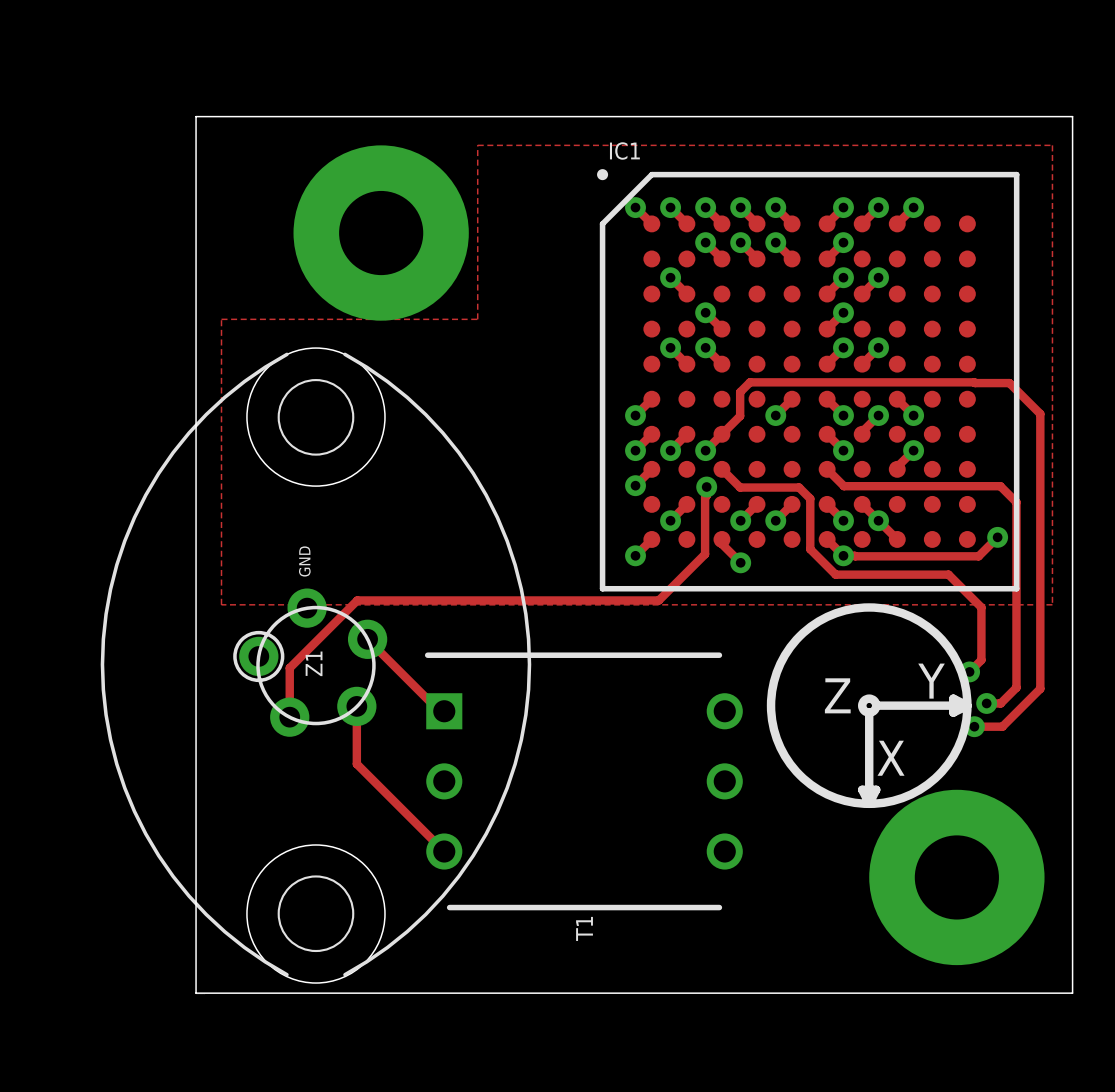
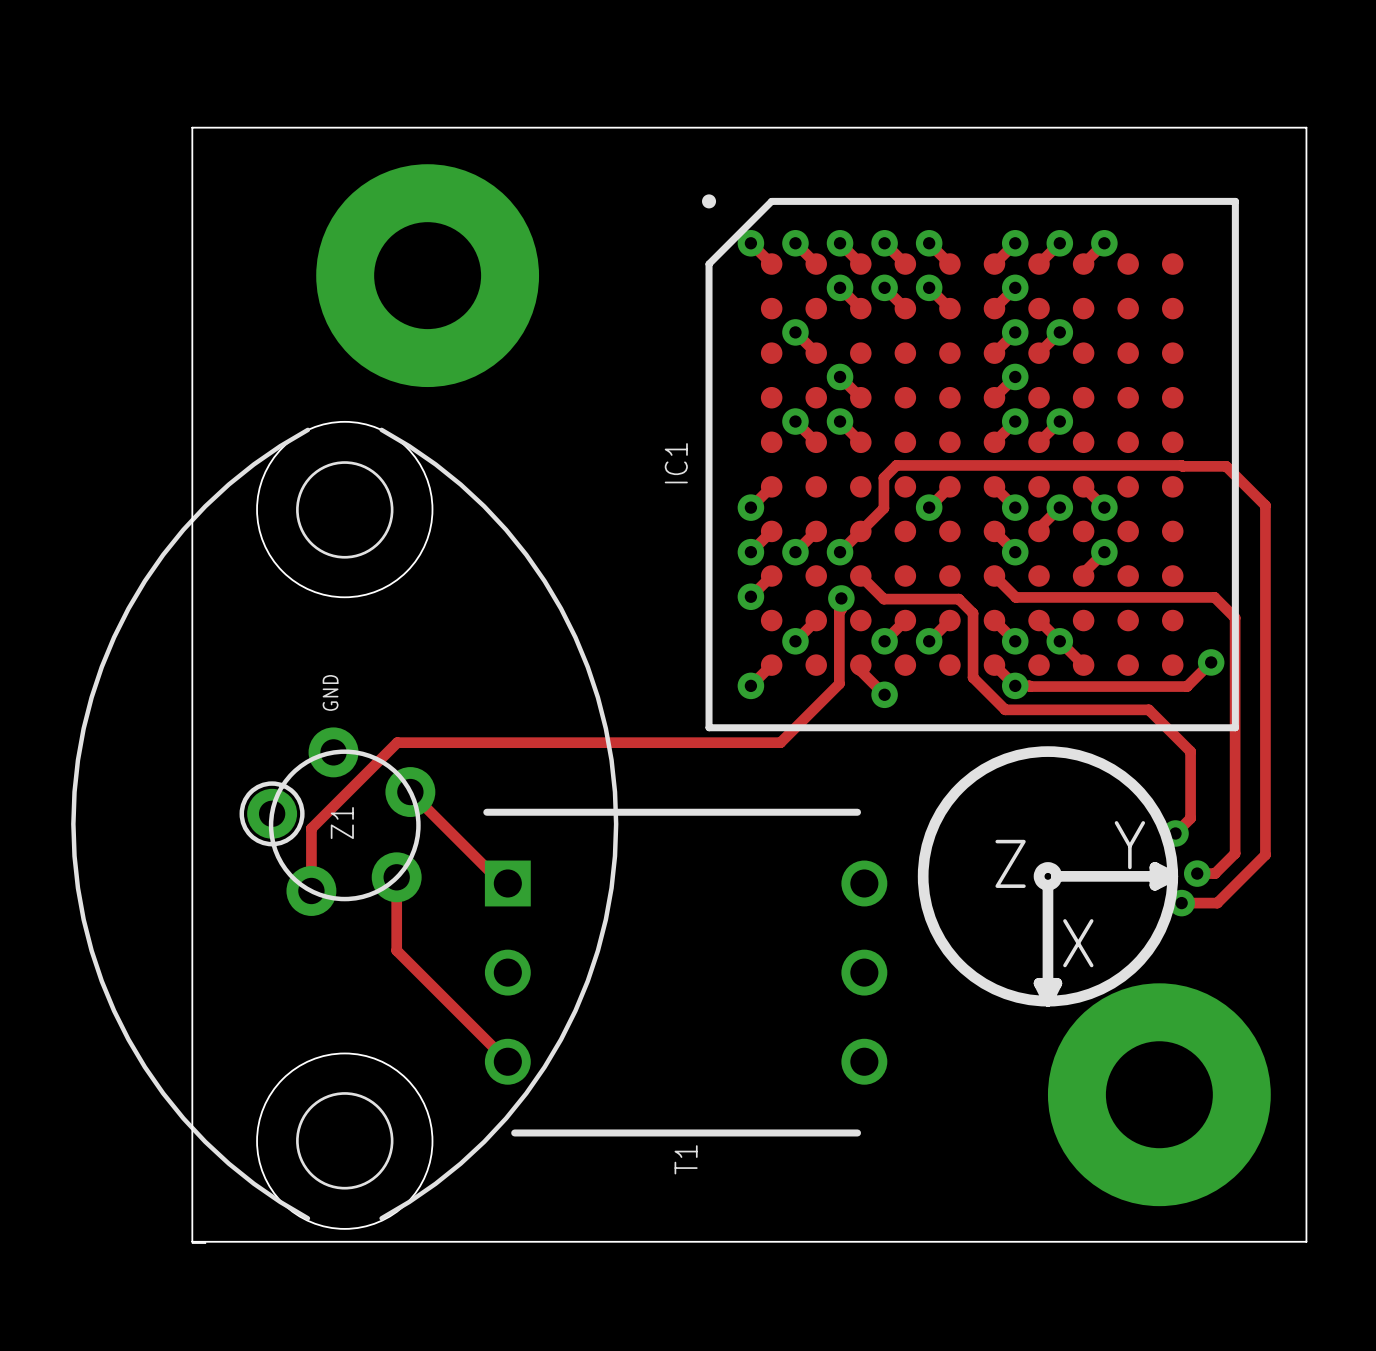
zone outline: (477, 145) (1052, 145) (1052, 604) (221, 604) (221, 319) (477, 319) (477, 145) -> none
IC1 name rotation: 0° (624, 150) -> 90° counterclockwise (676, 463)
IC1 name position: IC1 (624, 150) -> IC1 (676, 463)

